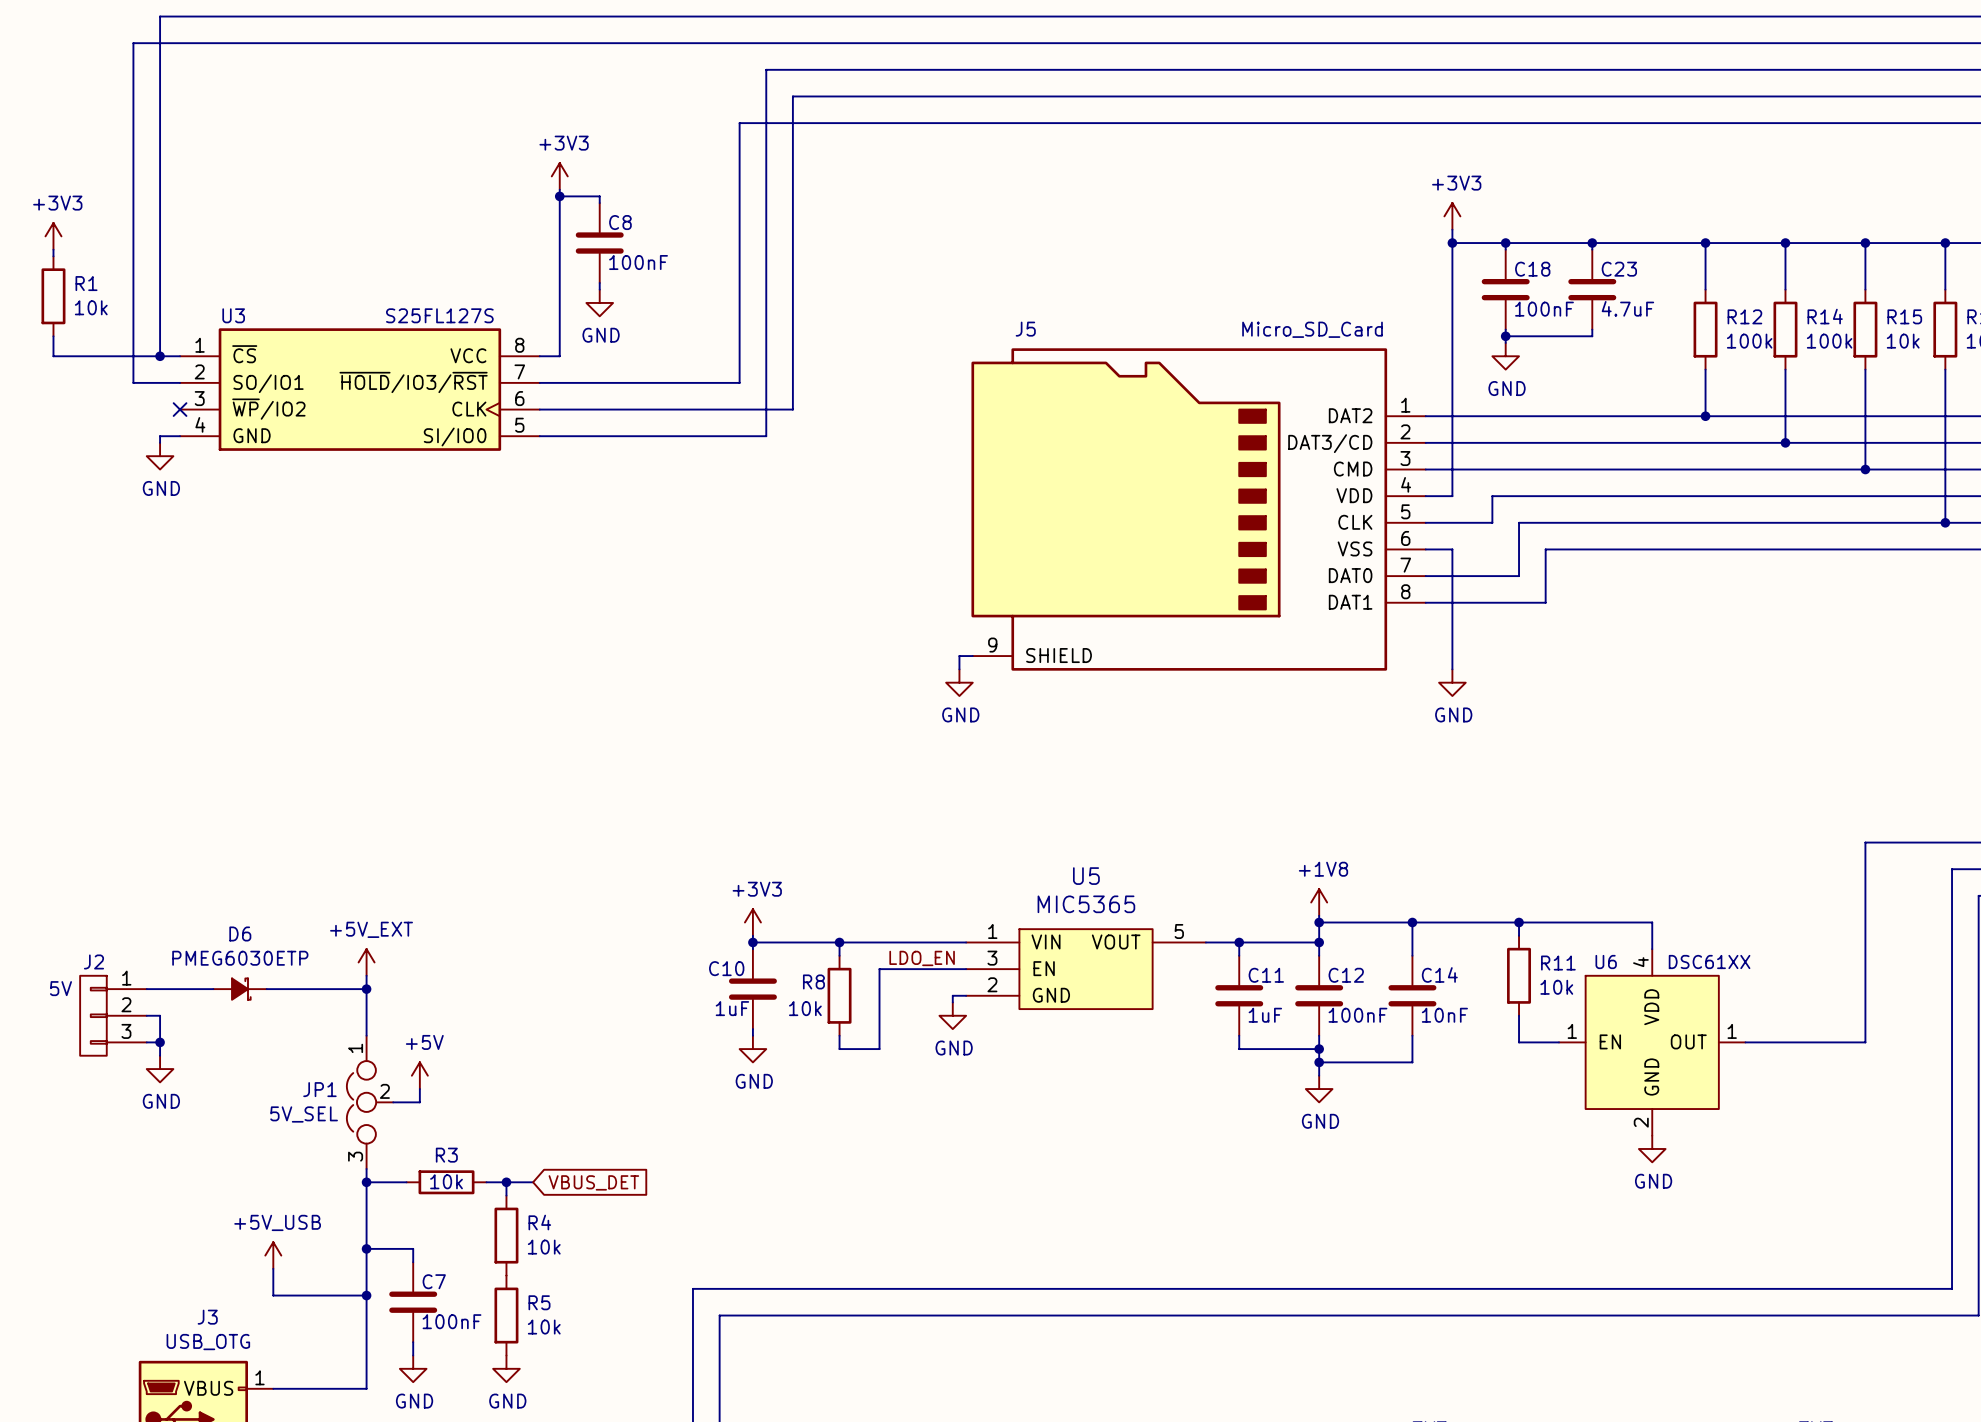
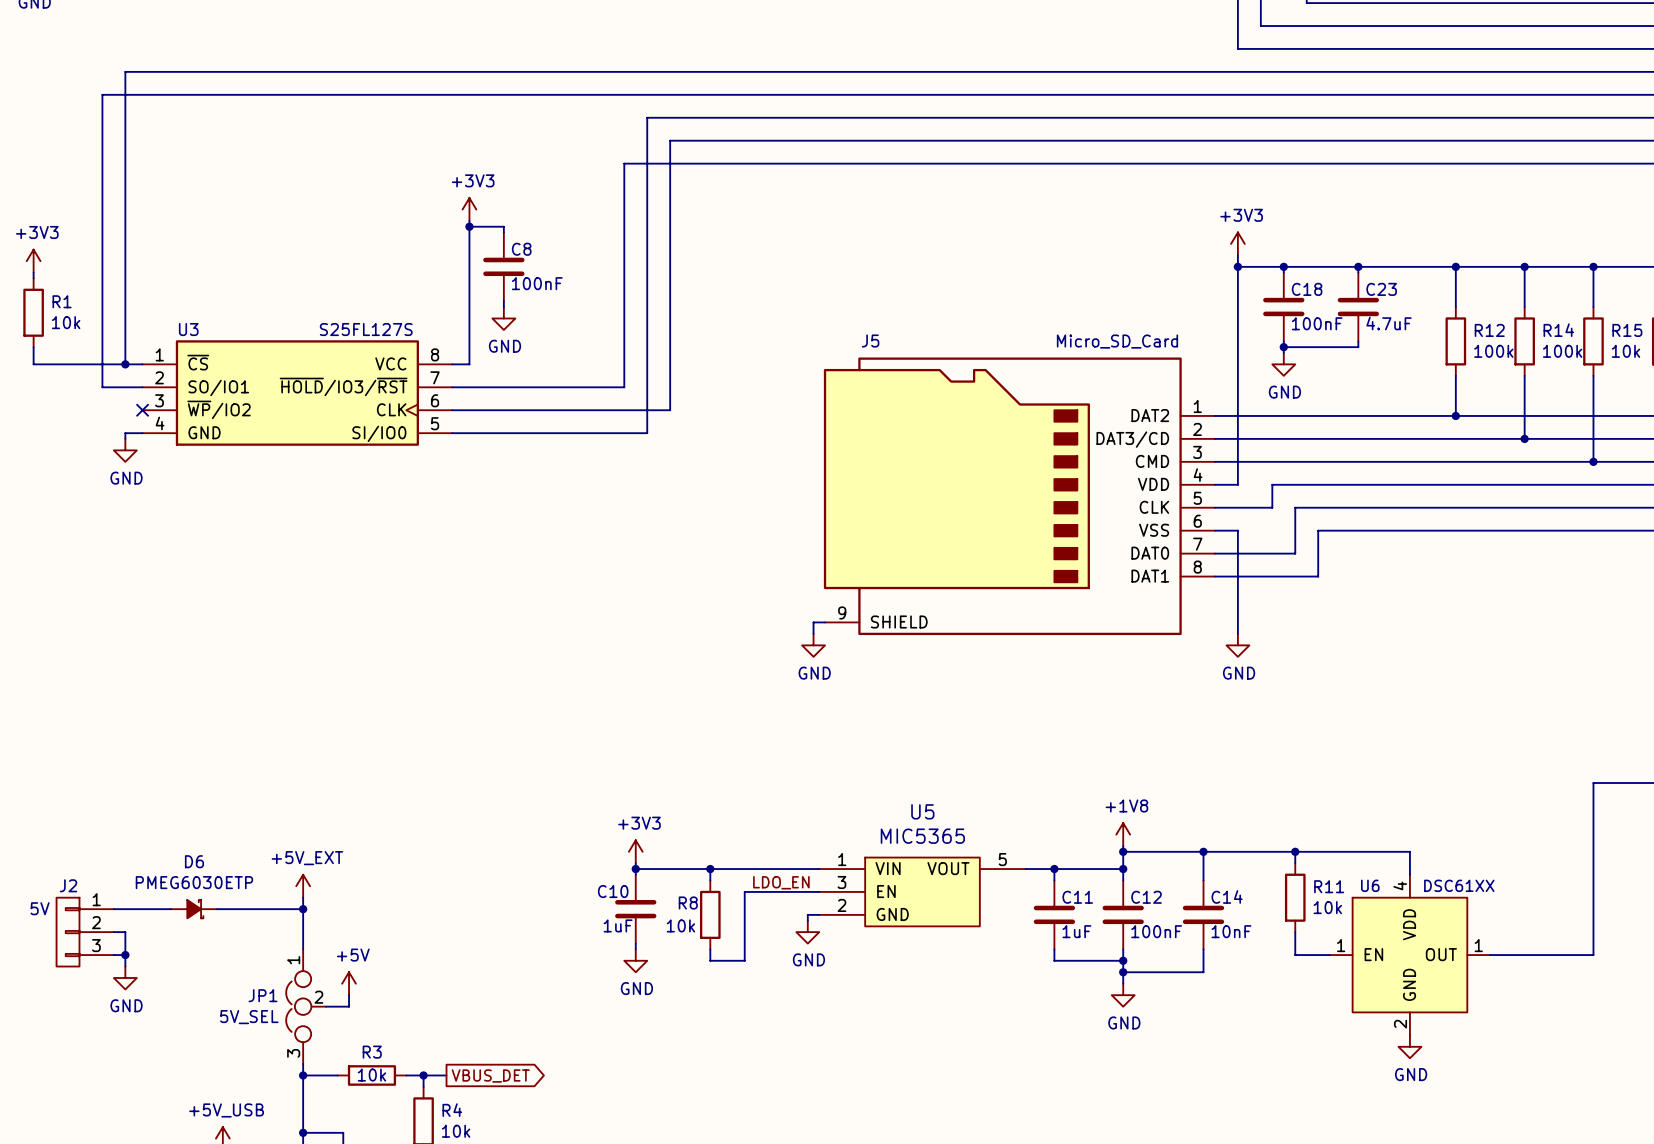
global label shape: input (593, 1182) -> output (490, 1075)

